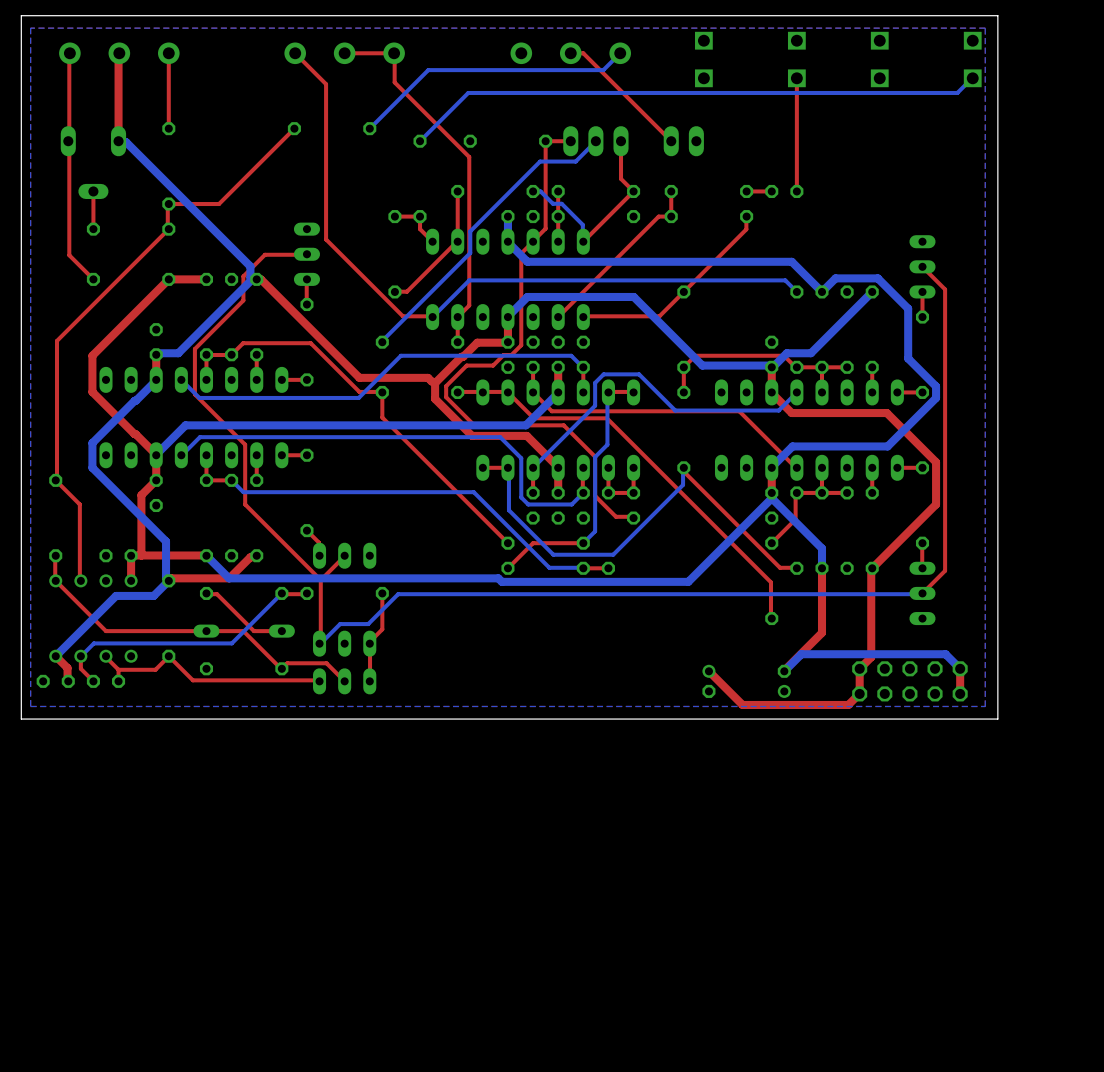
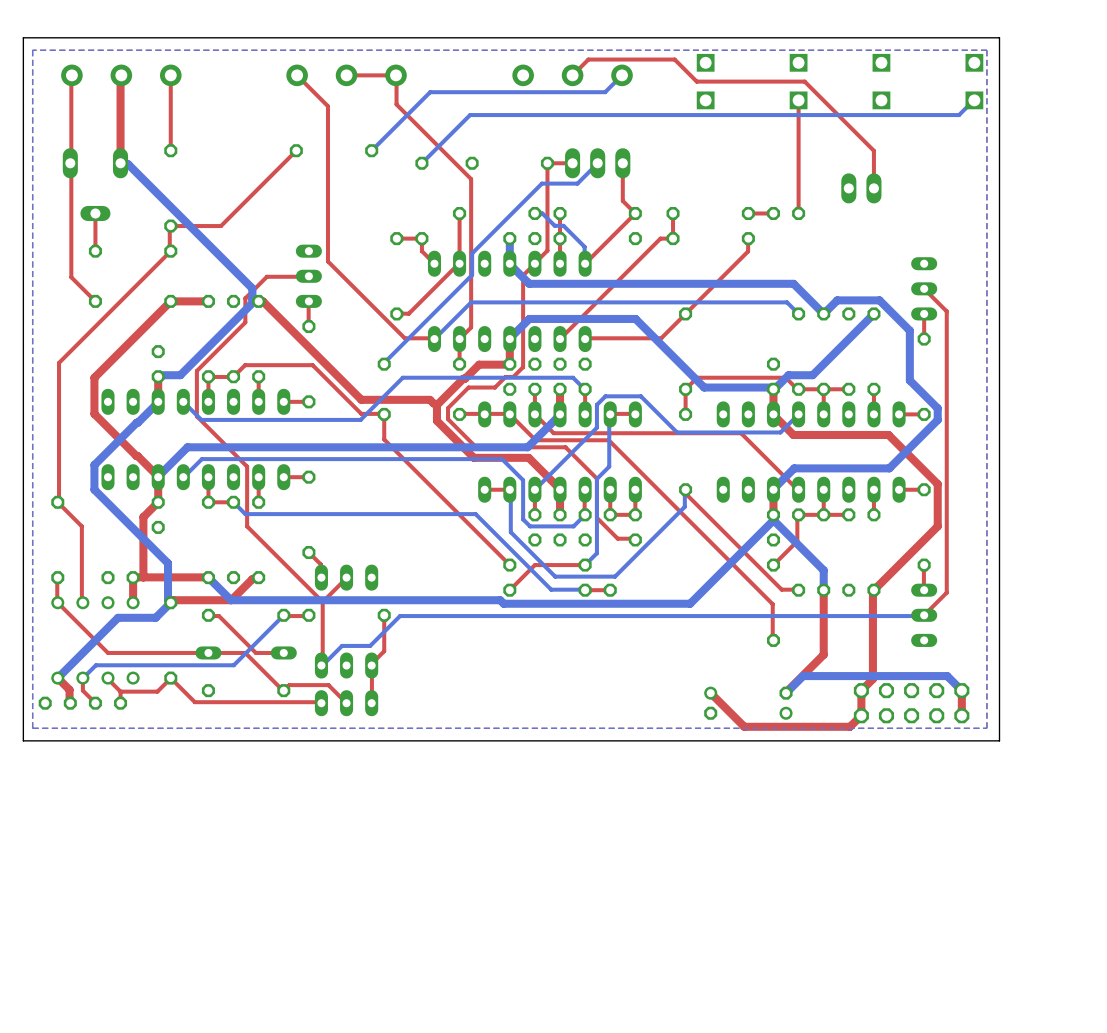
top track: (570, 53) (583, 53) (671, 141) -> (572, 75) (588, 59) (674, 59) (696, 81) (804, 81) (873, 150) (873, 188)
part position: (683, 141) -> (861, 188)

